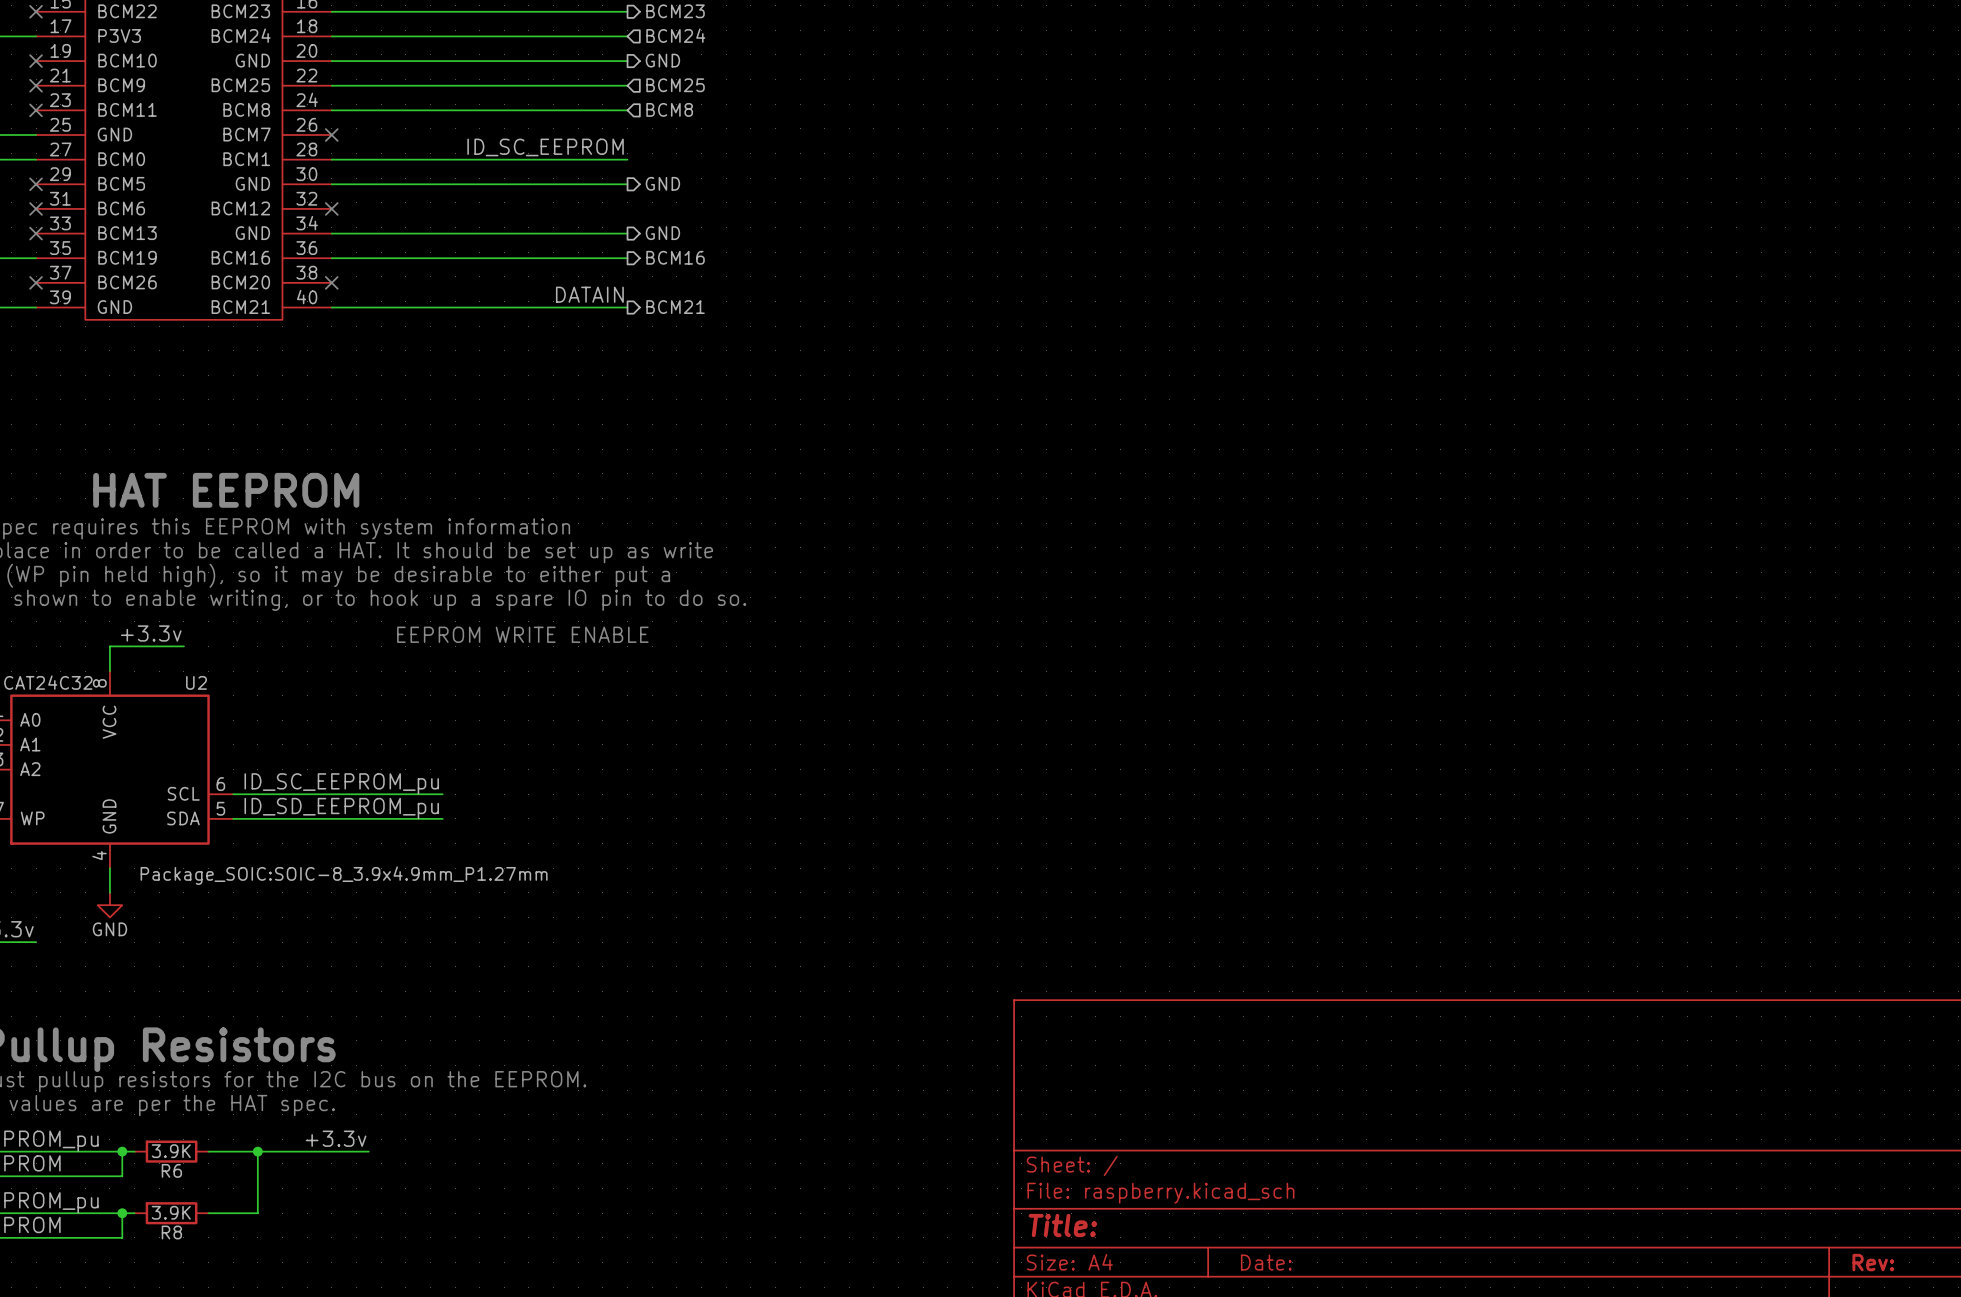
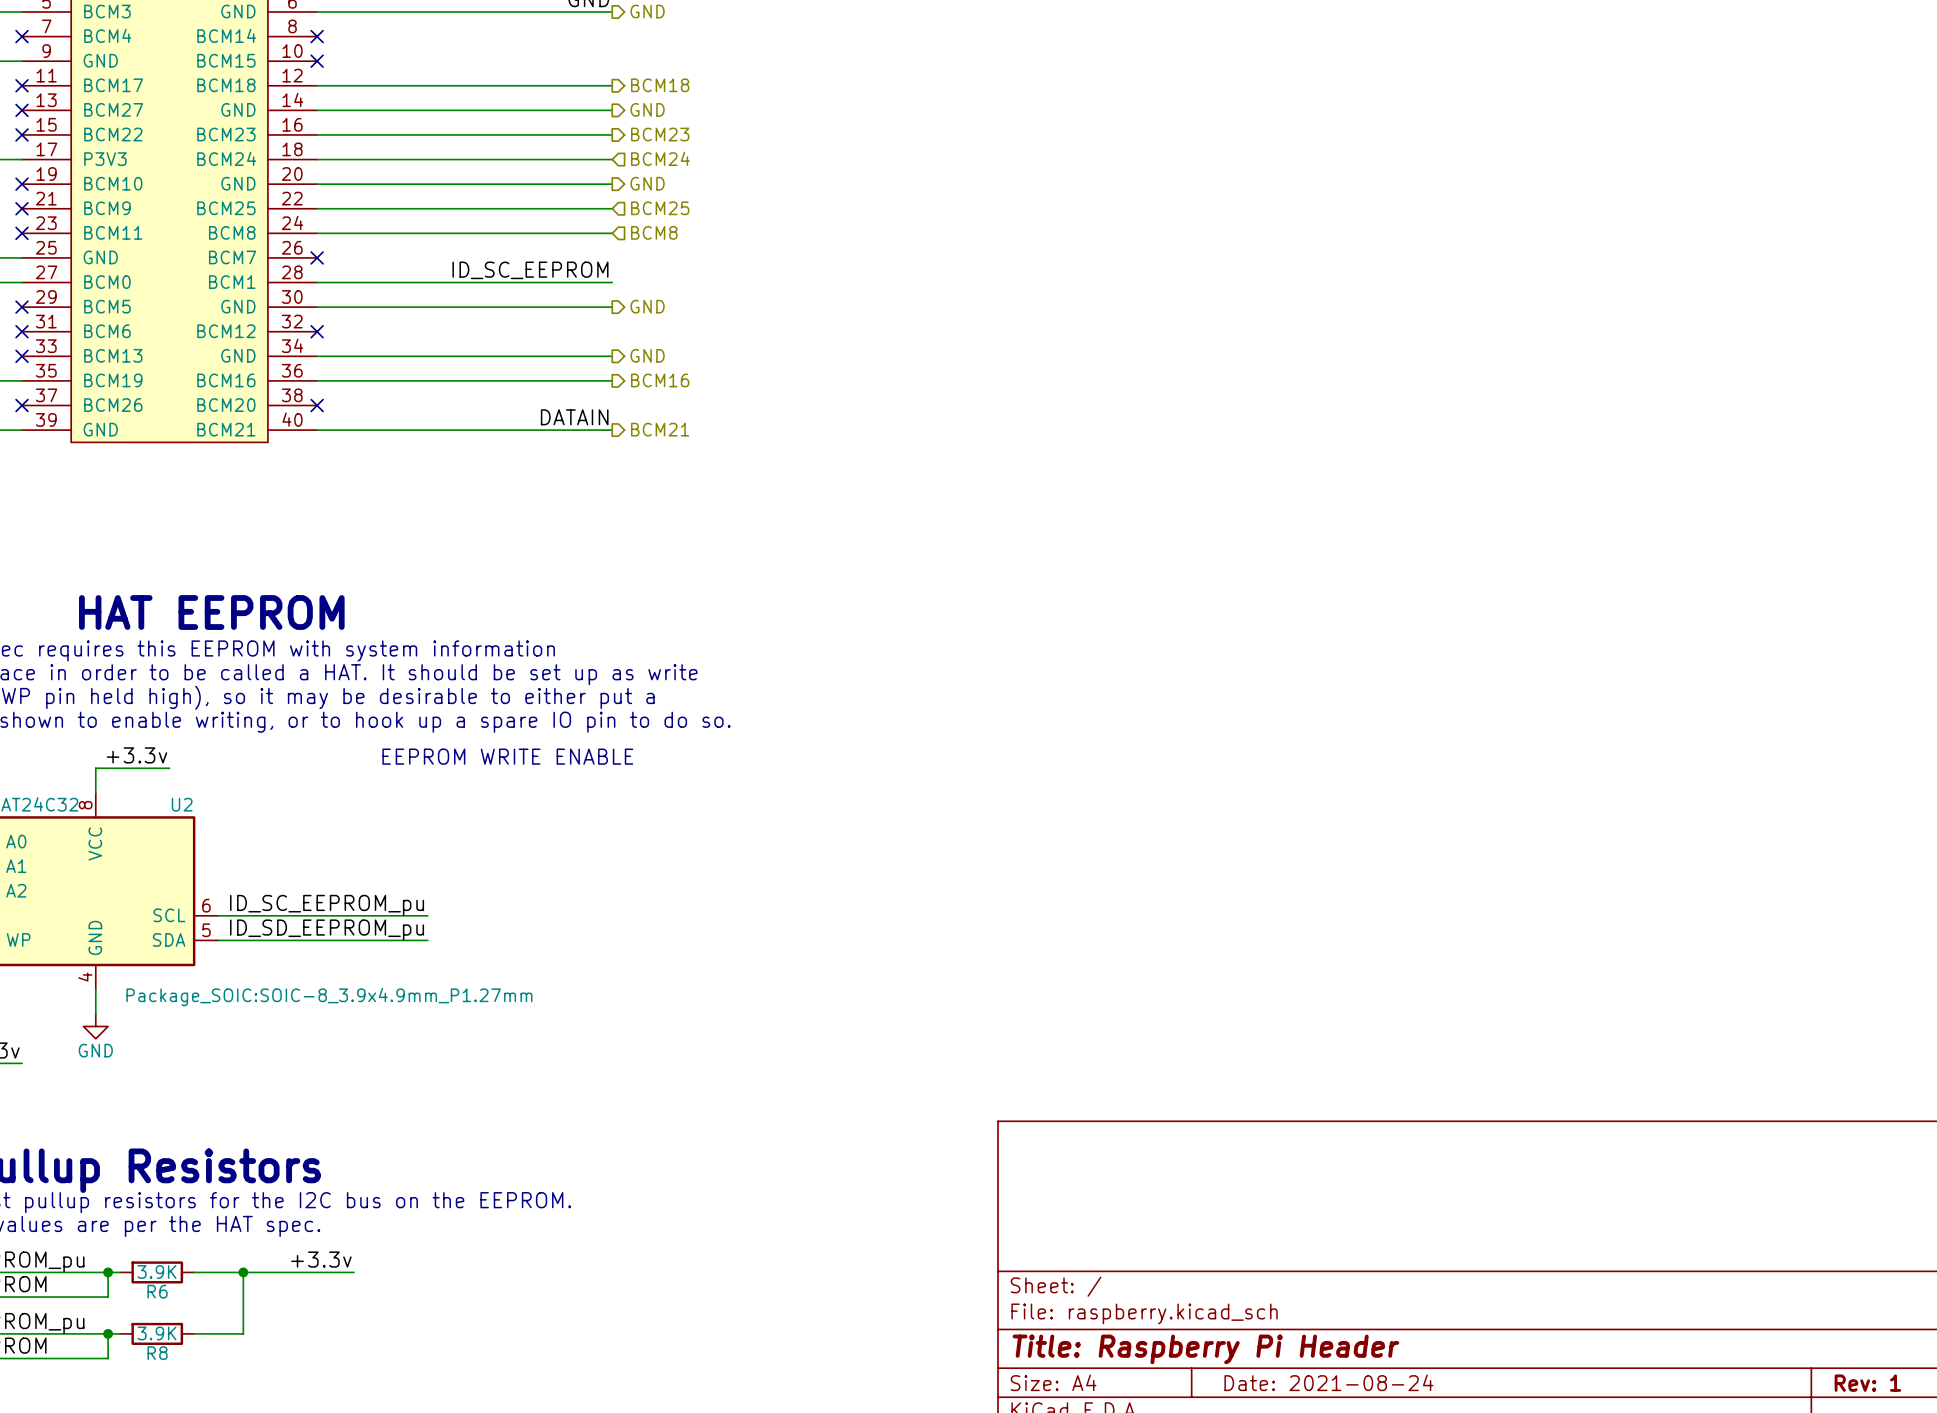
title block: Title: (1062, 1225) -> Title: Raspberry Pi Header (1205, 1349)
title block: Date: (1266, 1262) -> Date: 2021-08-24 (1328, 1382)
title block: Rev: (1873, 1262) -> Rev: 1 (1867, 1383)

